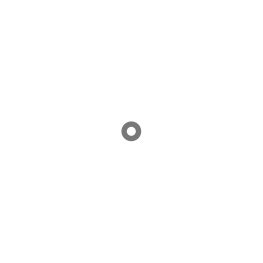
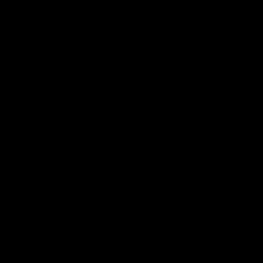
via: (131, 131) -> none

